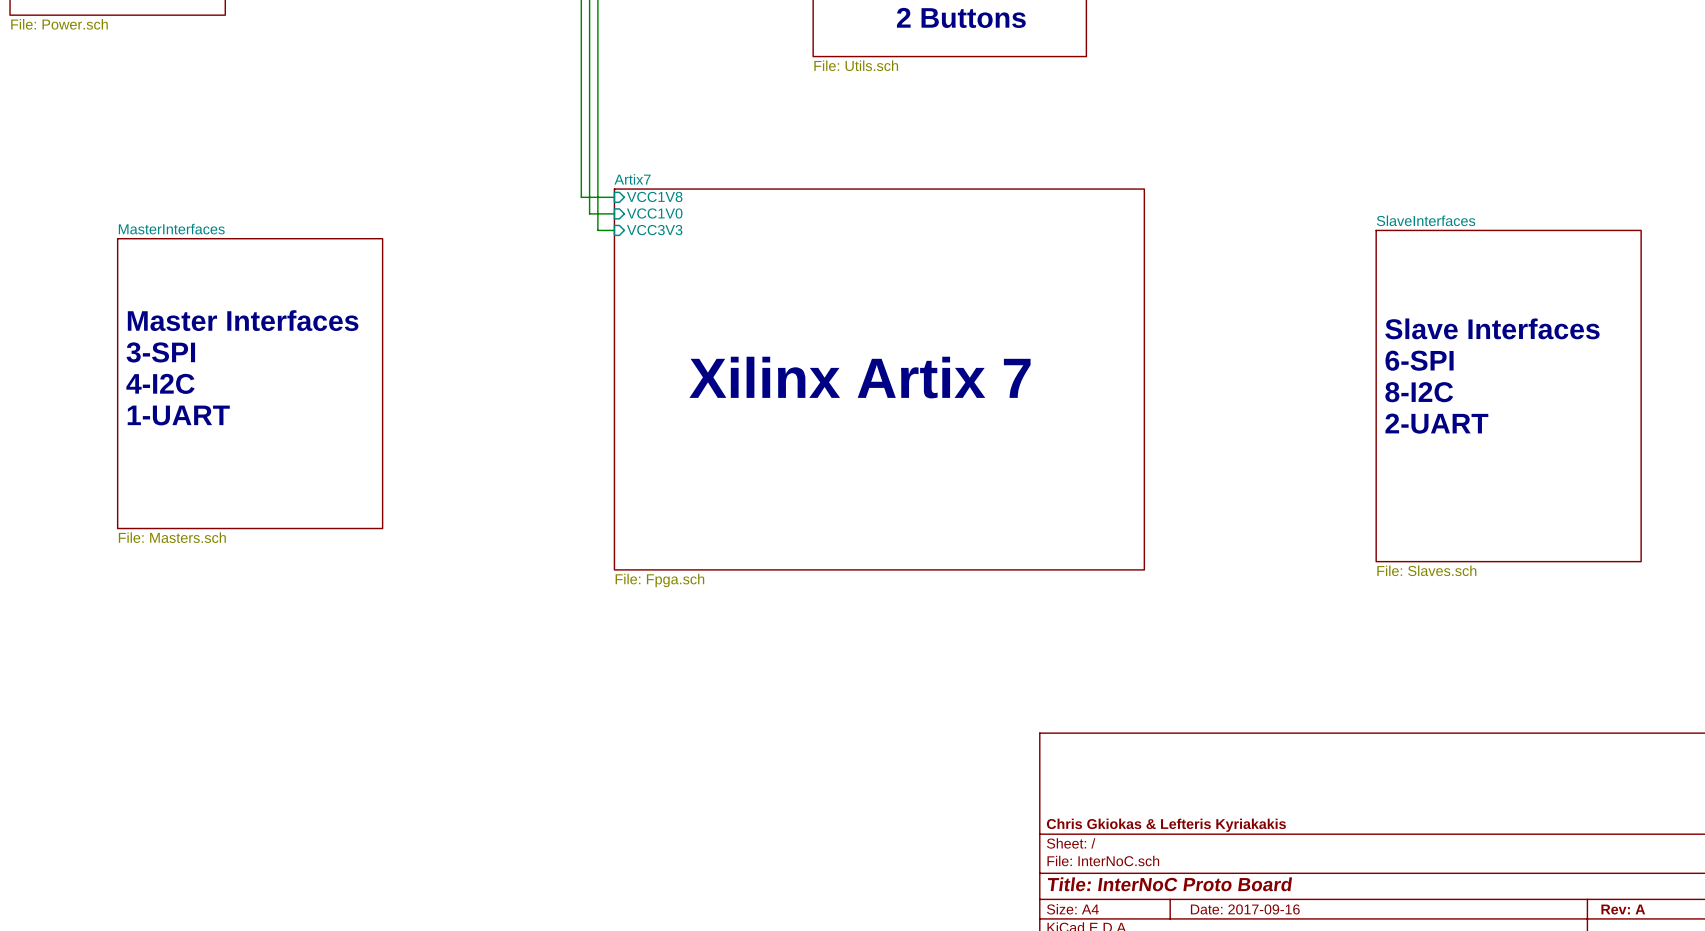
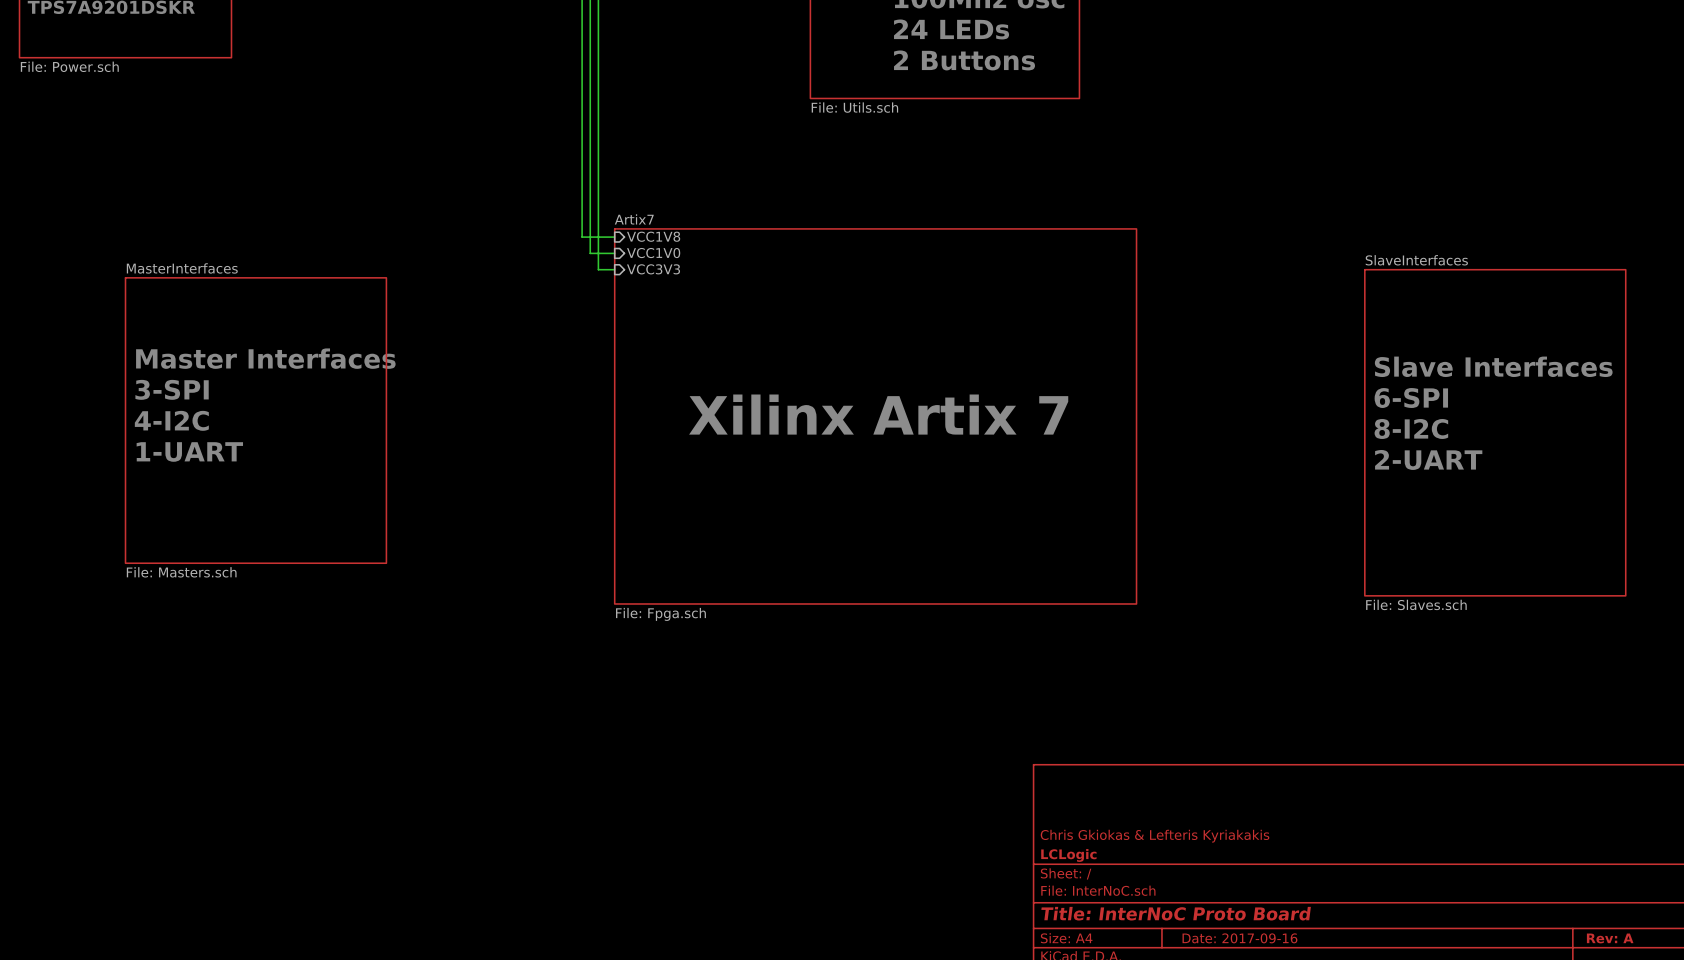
title block: none -> Chris Gkiokas & Lefteris Kyriakakis (1155, 836)
title block: Chris Gkiokas & Lefteris Kyriakakis (1166, 825) -> LCLogic (1068, 855)

